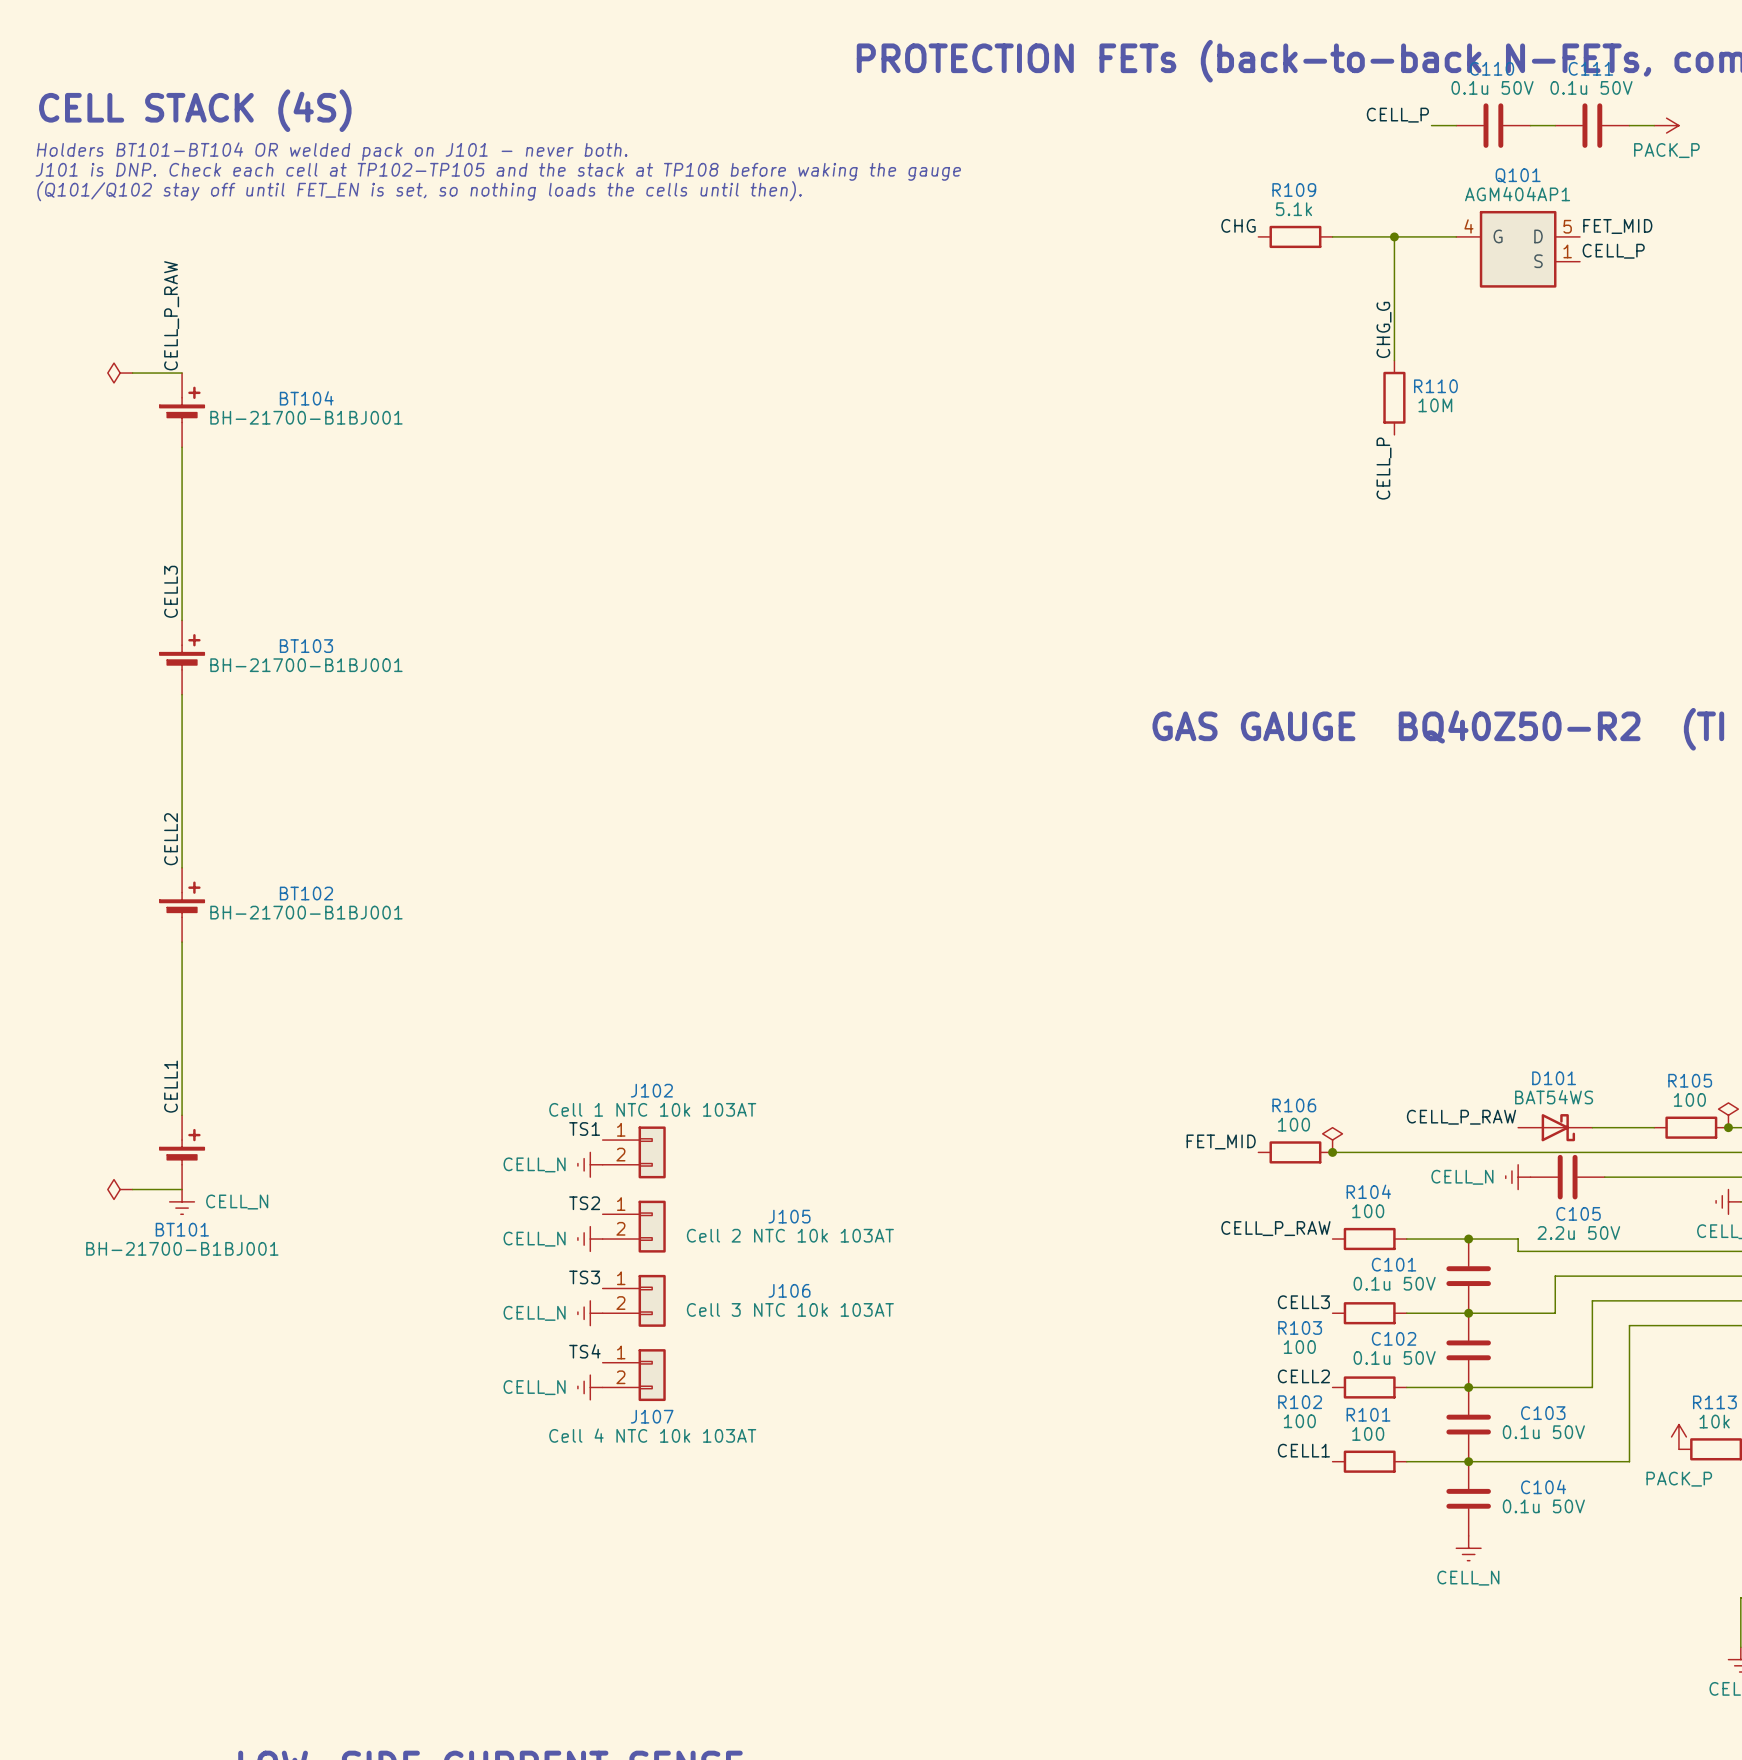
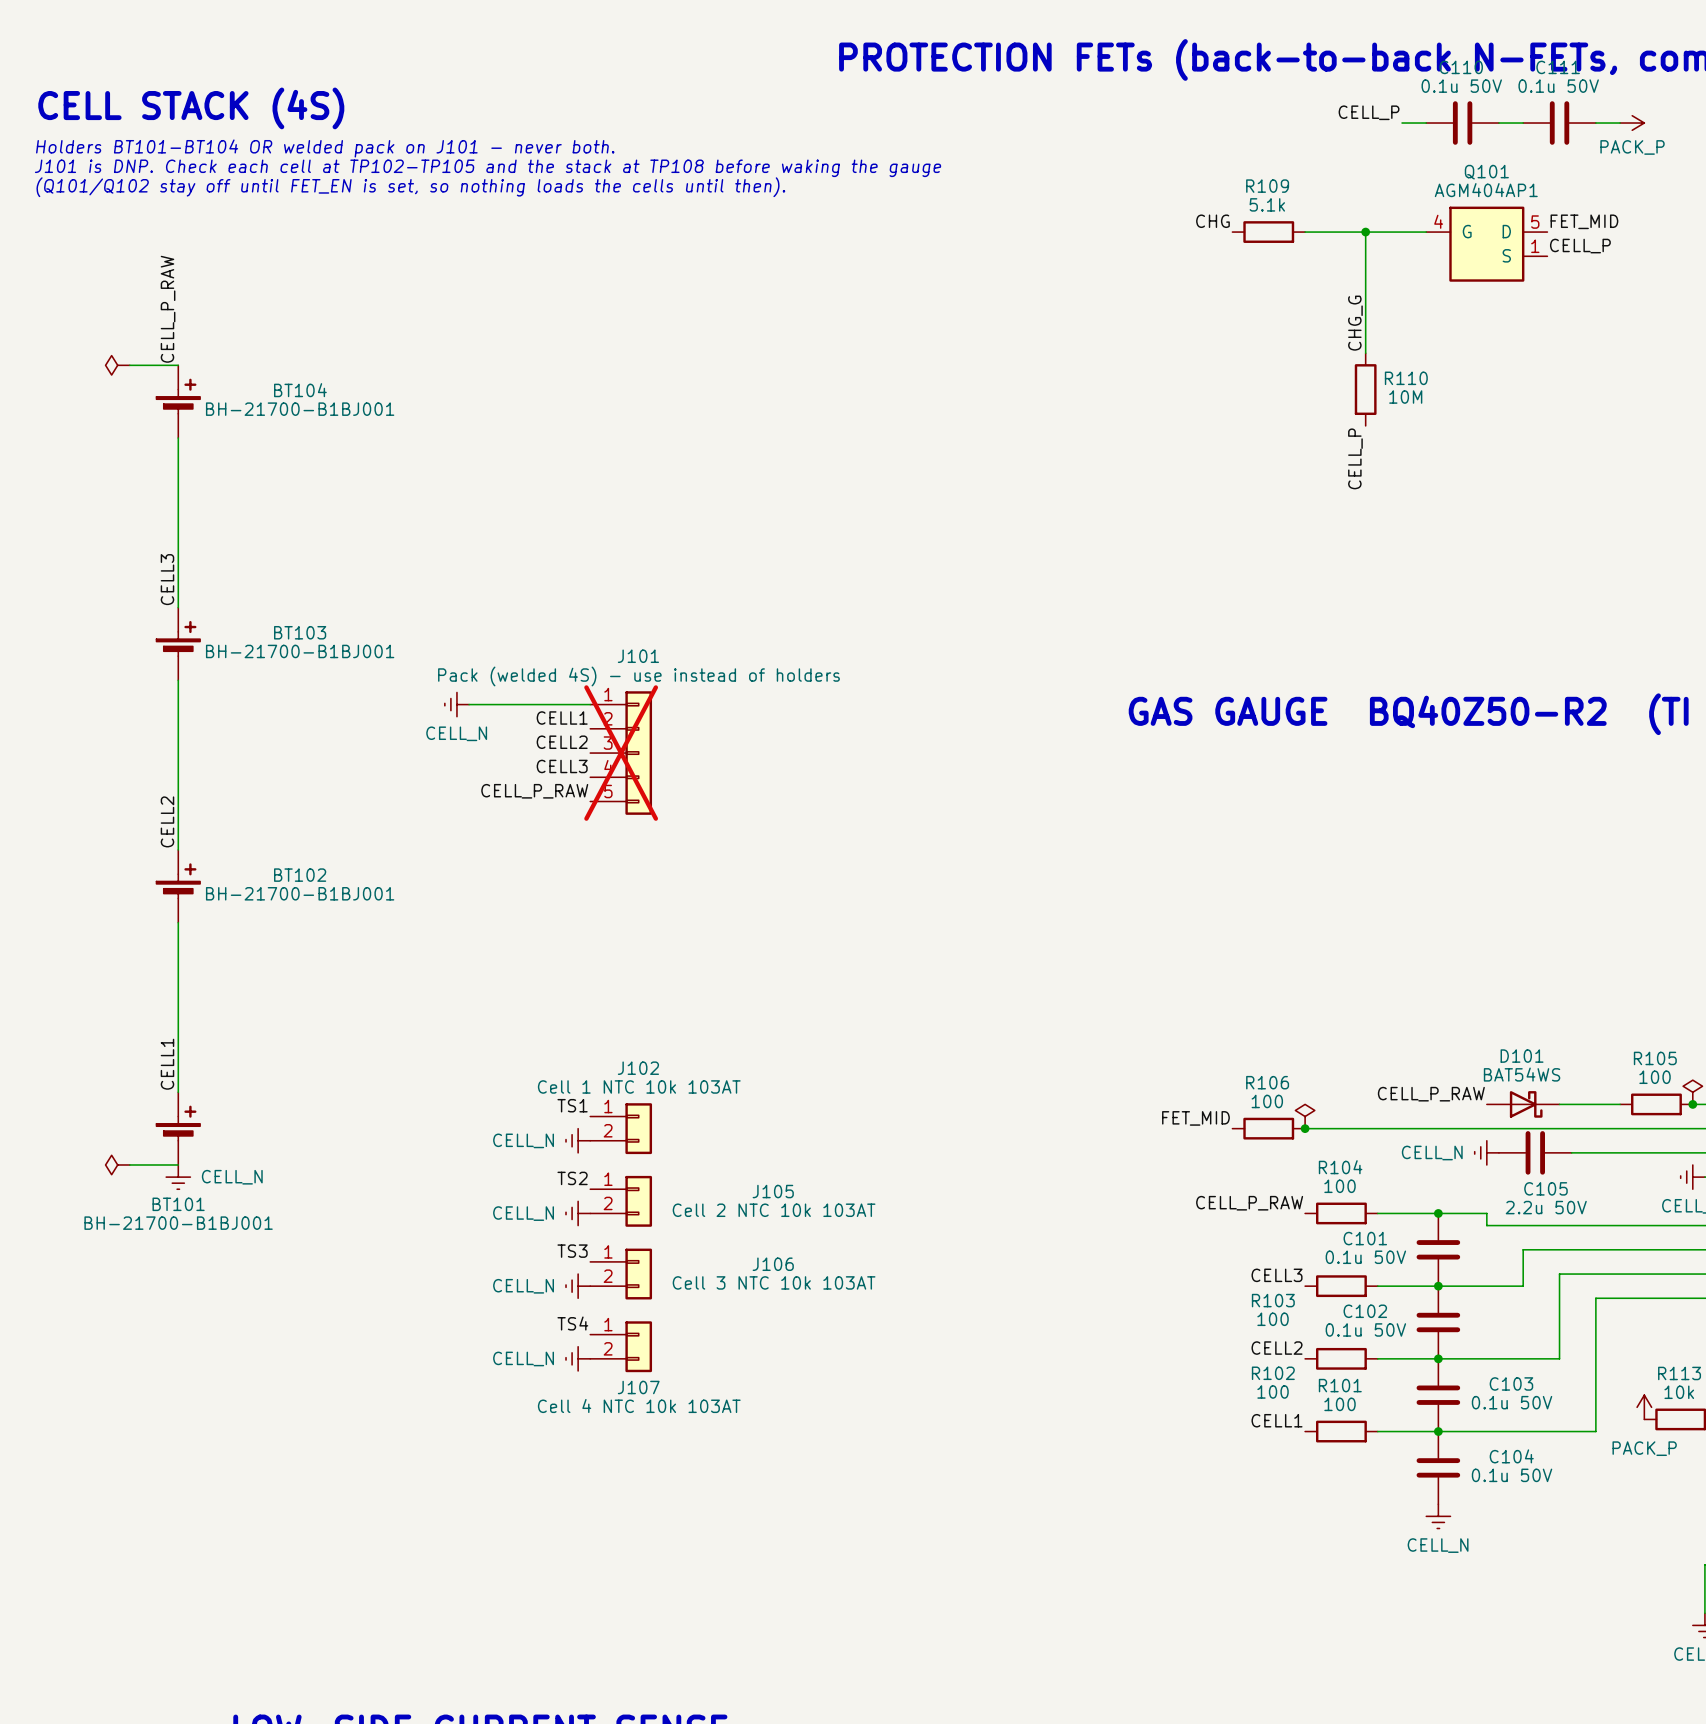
power symbol: none -> CELL_N (456, 704)
wire: none -> (469, 704) (590, 704)
label: none -> CELL1 (562, 718)
label: none -> CELL2 (562, 742)
J101: none -> Pack (welded 4S) - use instead of holders (621, 753)
label: none -> CELL3 (562, 766)
label: none -> CELL_P_RAW (534, 791)

